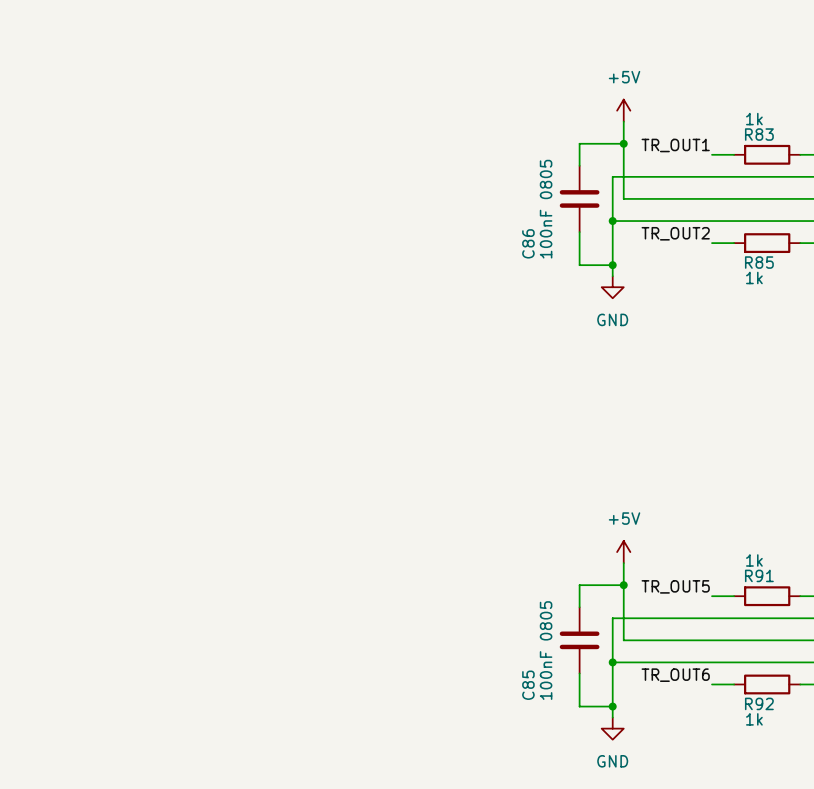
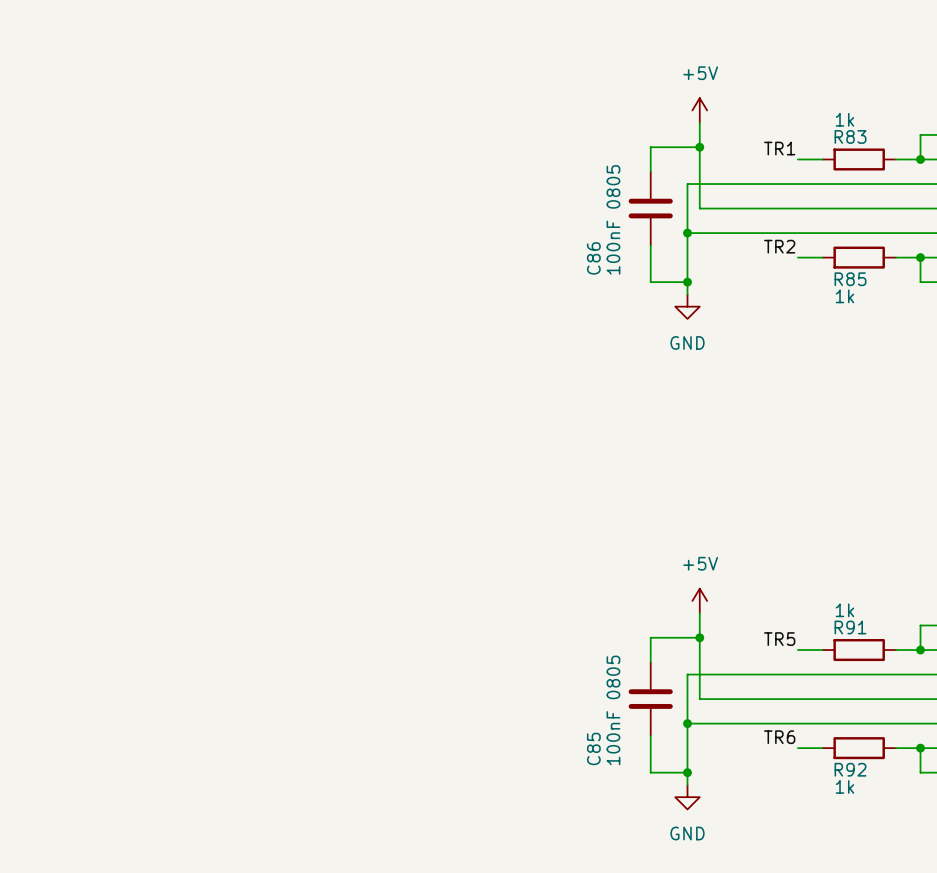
label: TR_OUT1 (675, 145) -> TR1 (779, 148)
label: TR_OUT2 (675, 233) -> TR2 (779, 246)
label: TR_OUT5 (675, 586) -> TR5 (779, 639)
label: TR_OUT6 (675, 675) -> TR6 (779, 737)

